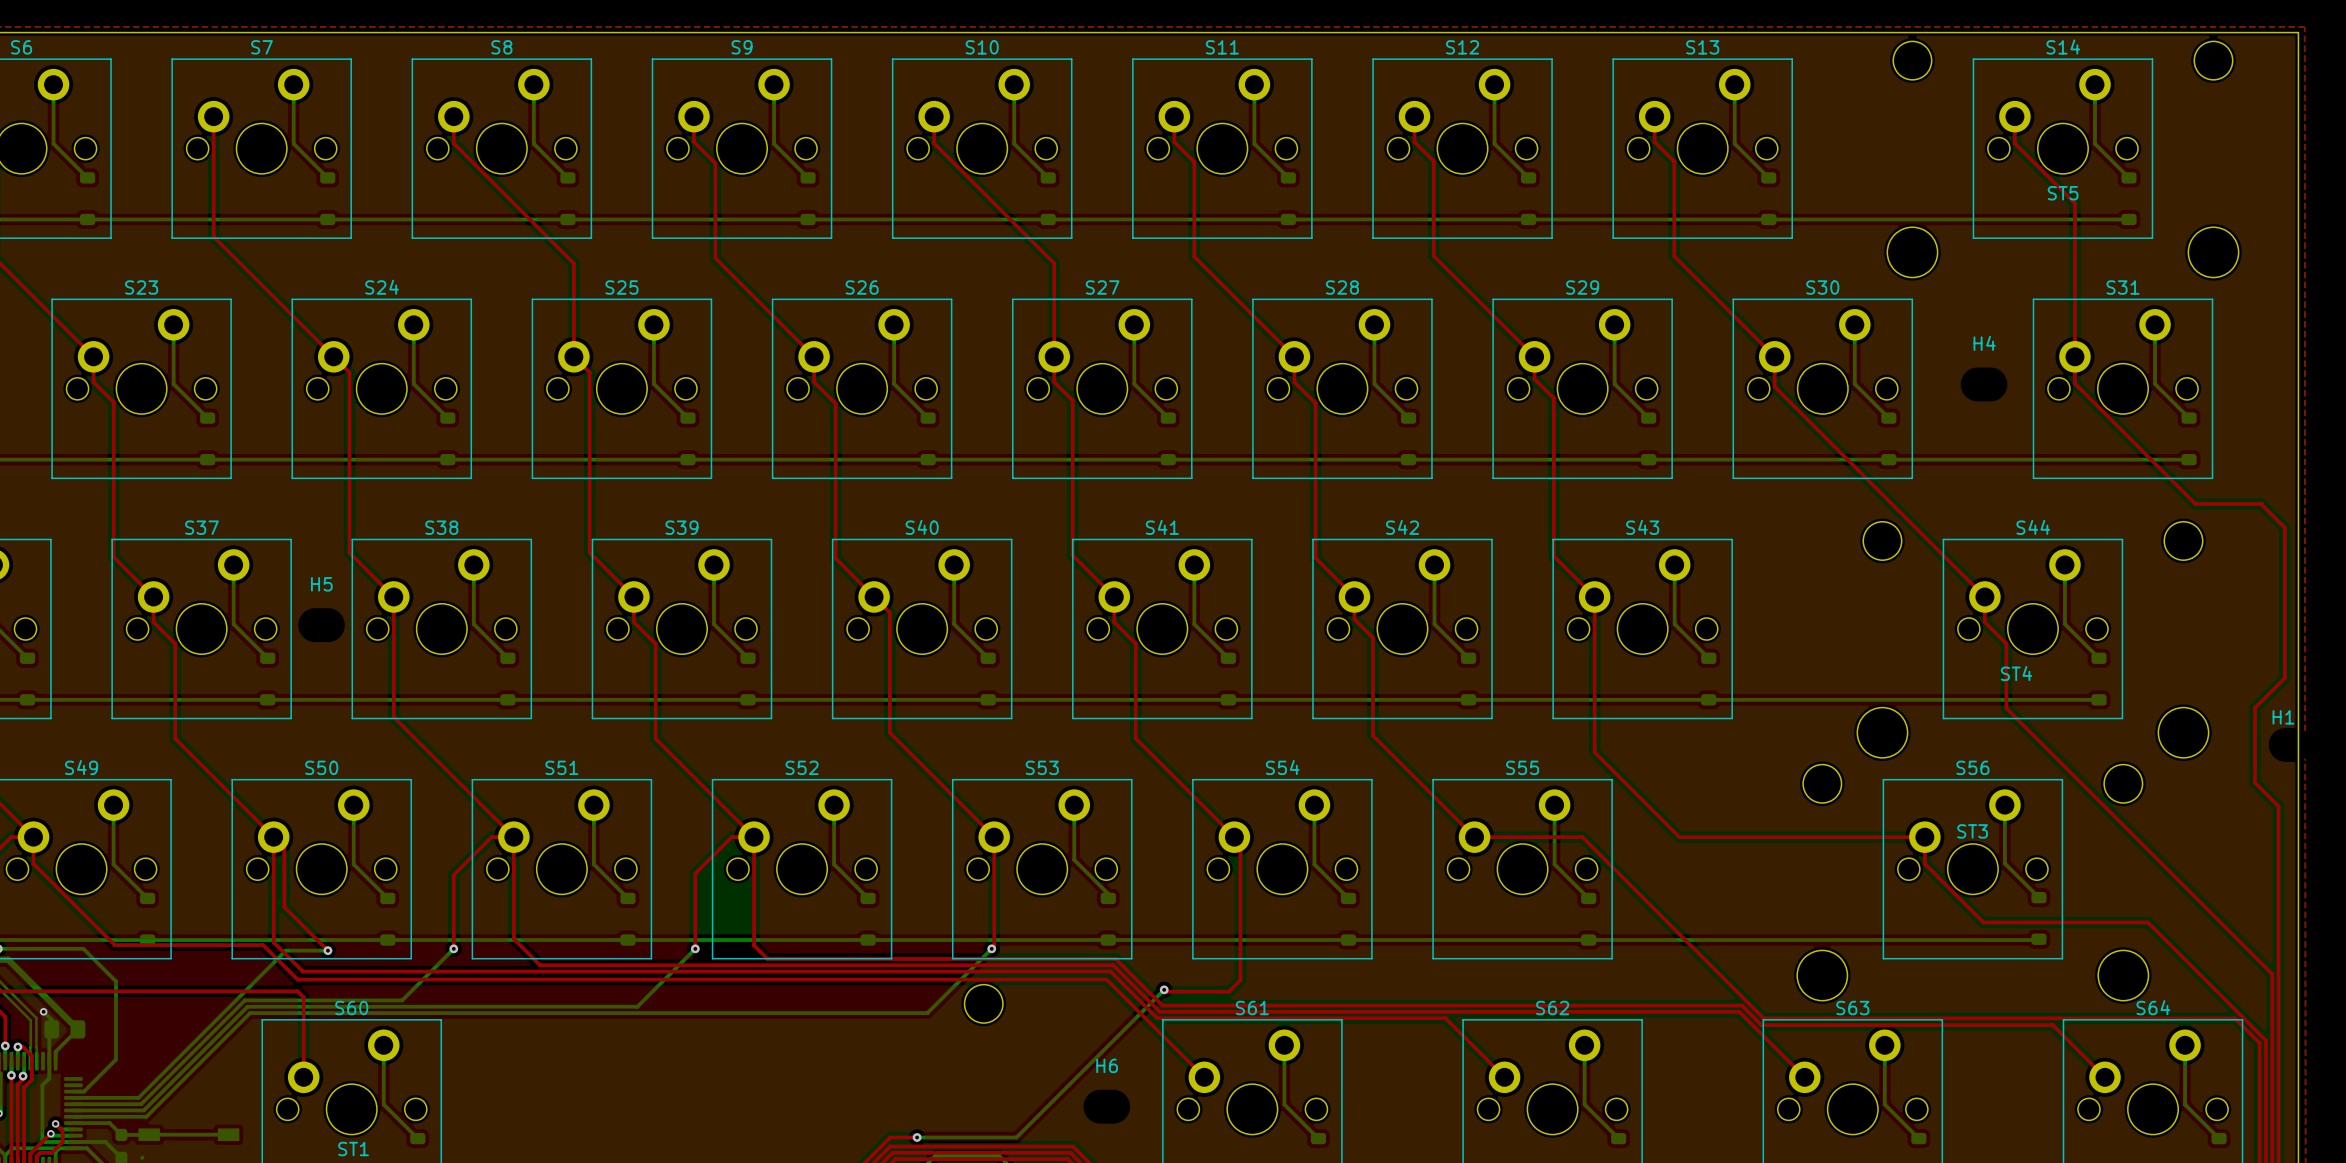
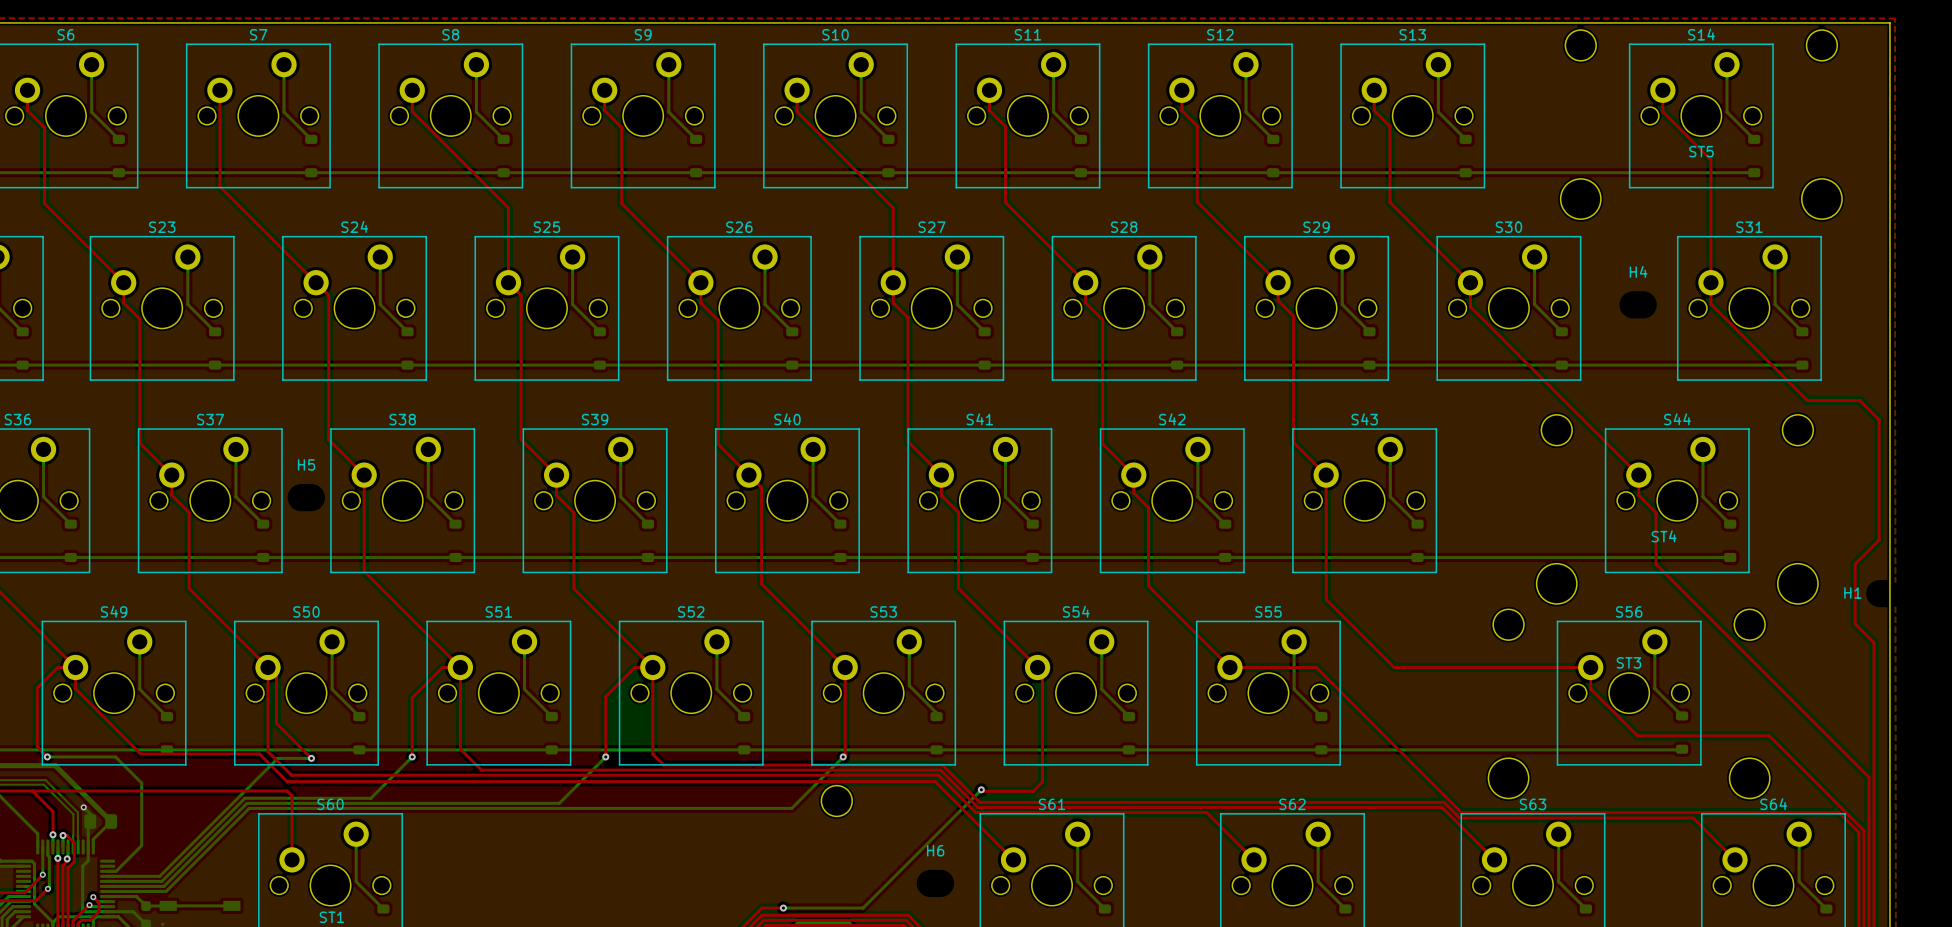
H1 name position: H1 (2283, 717) -> H1 (1852, 593)

